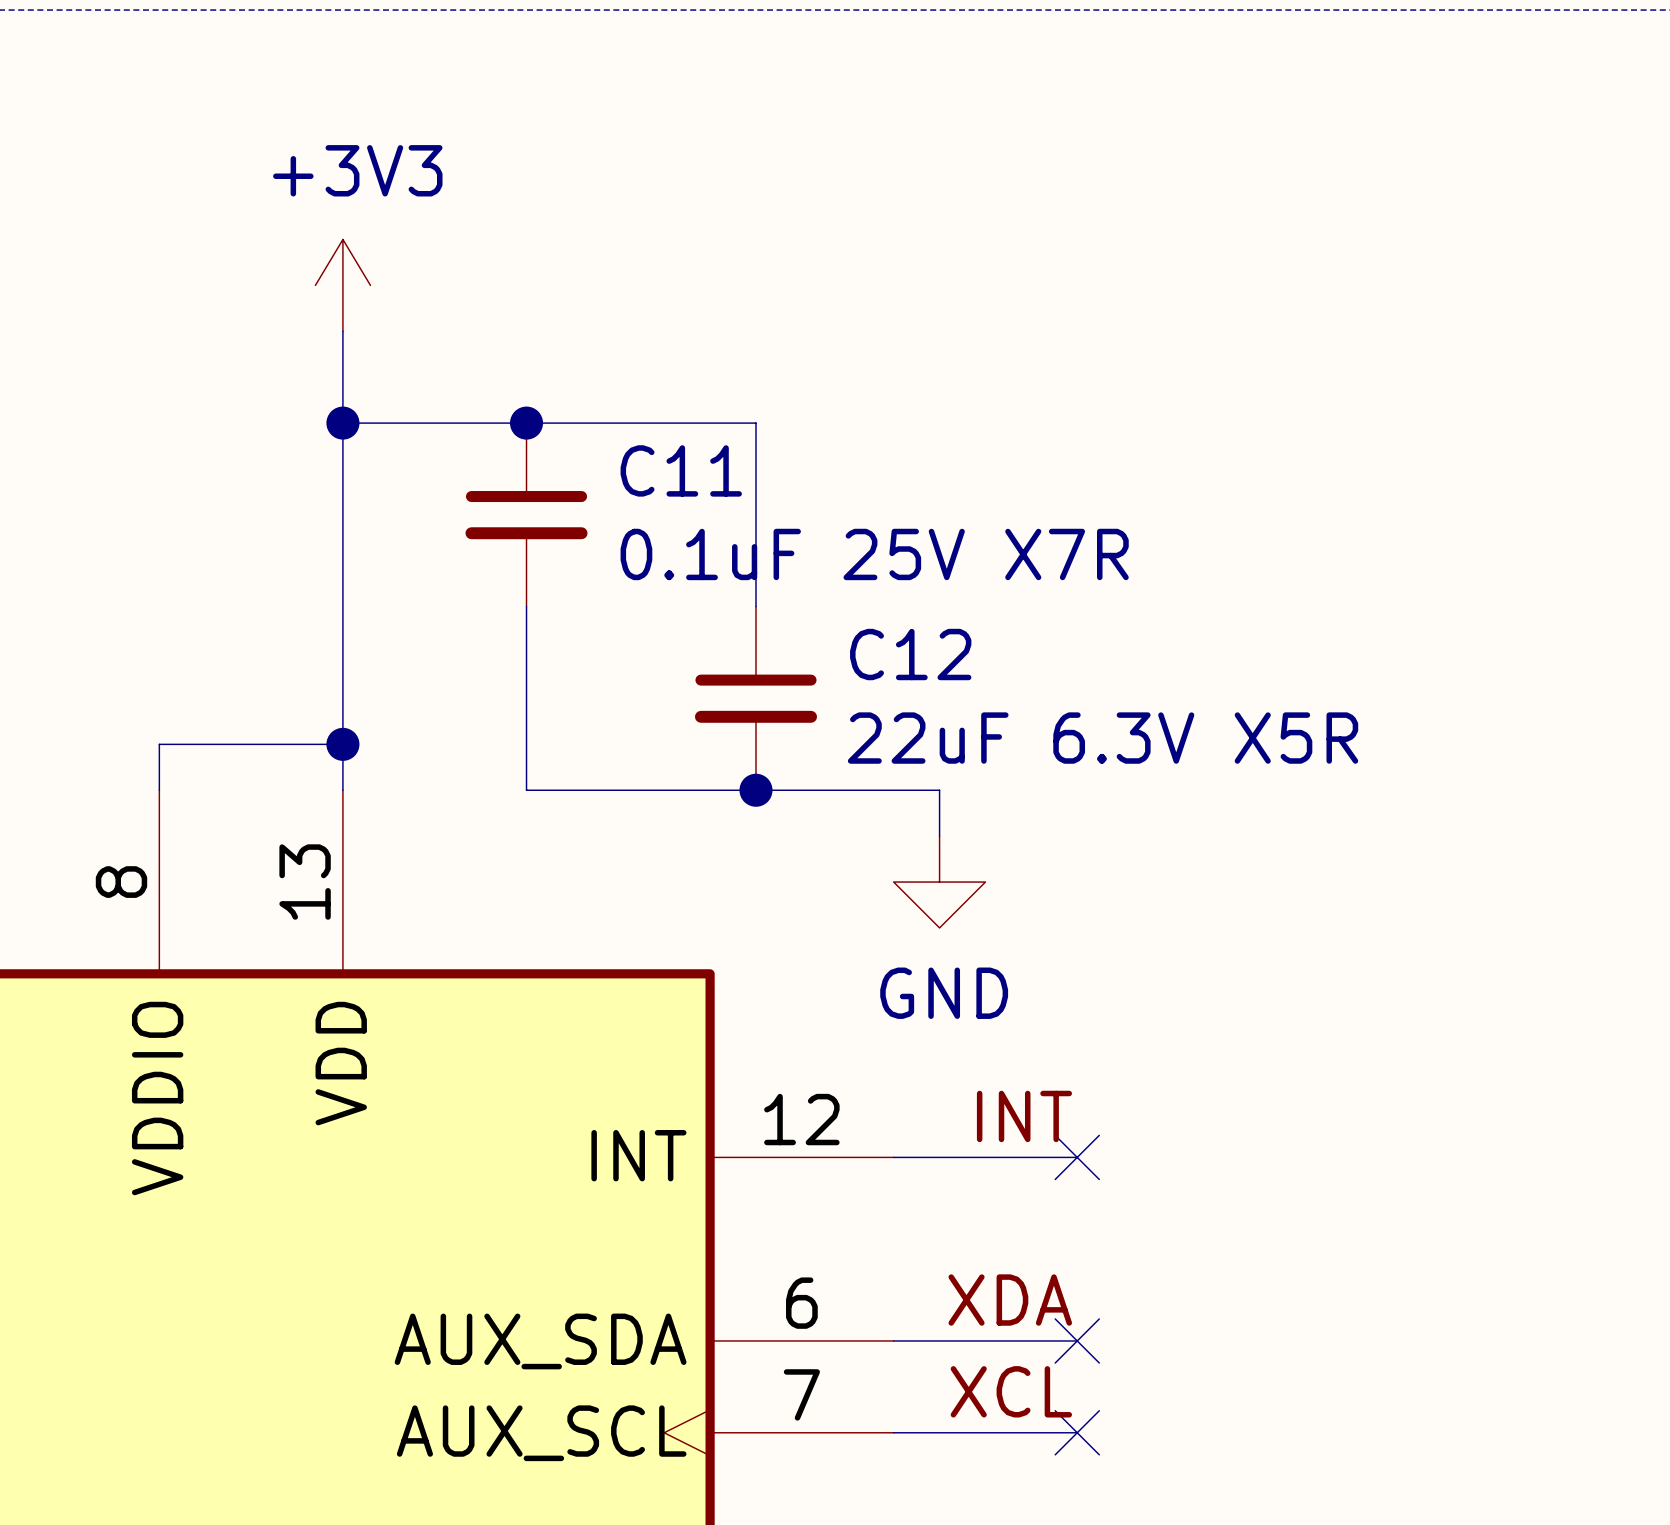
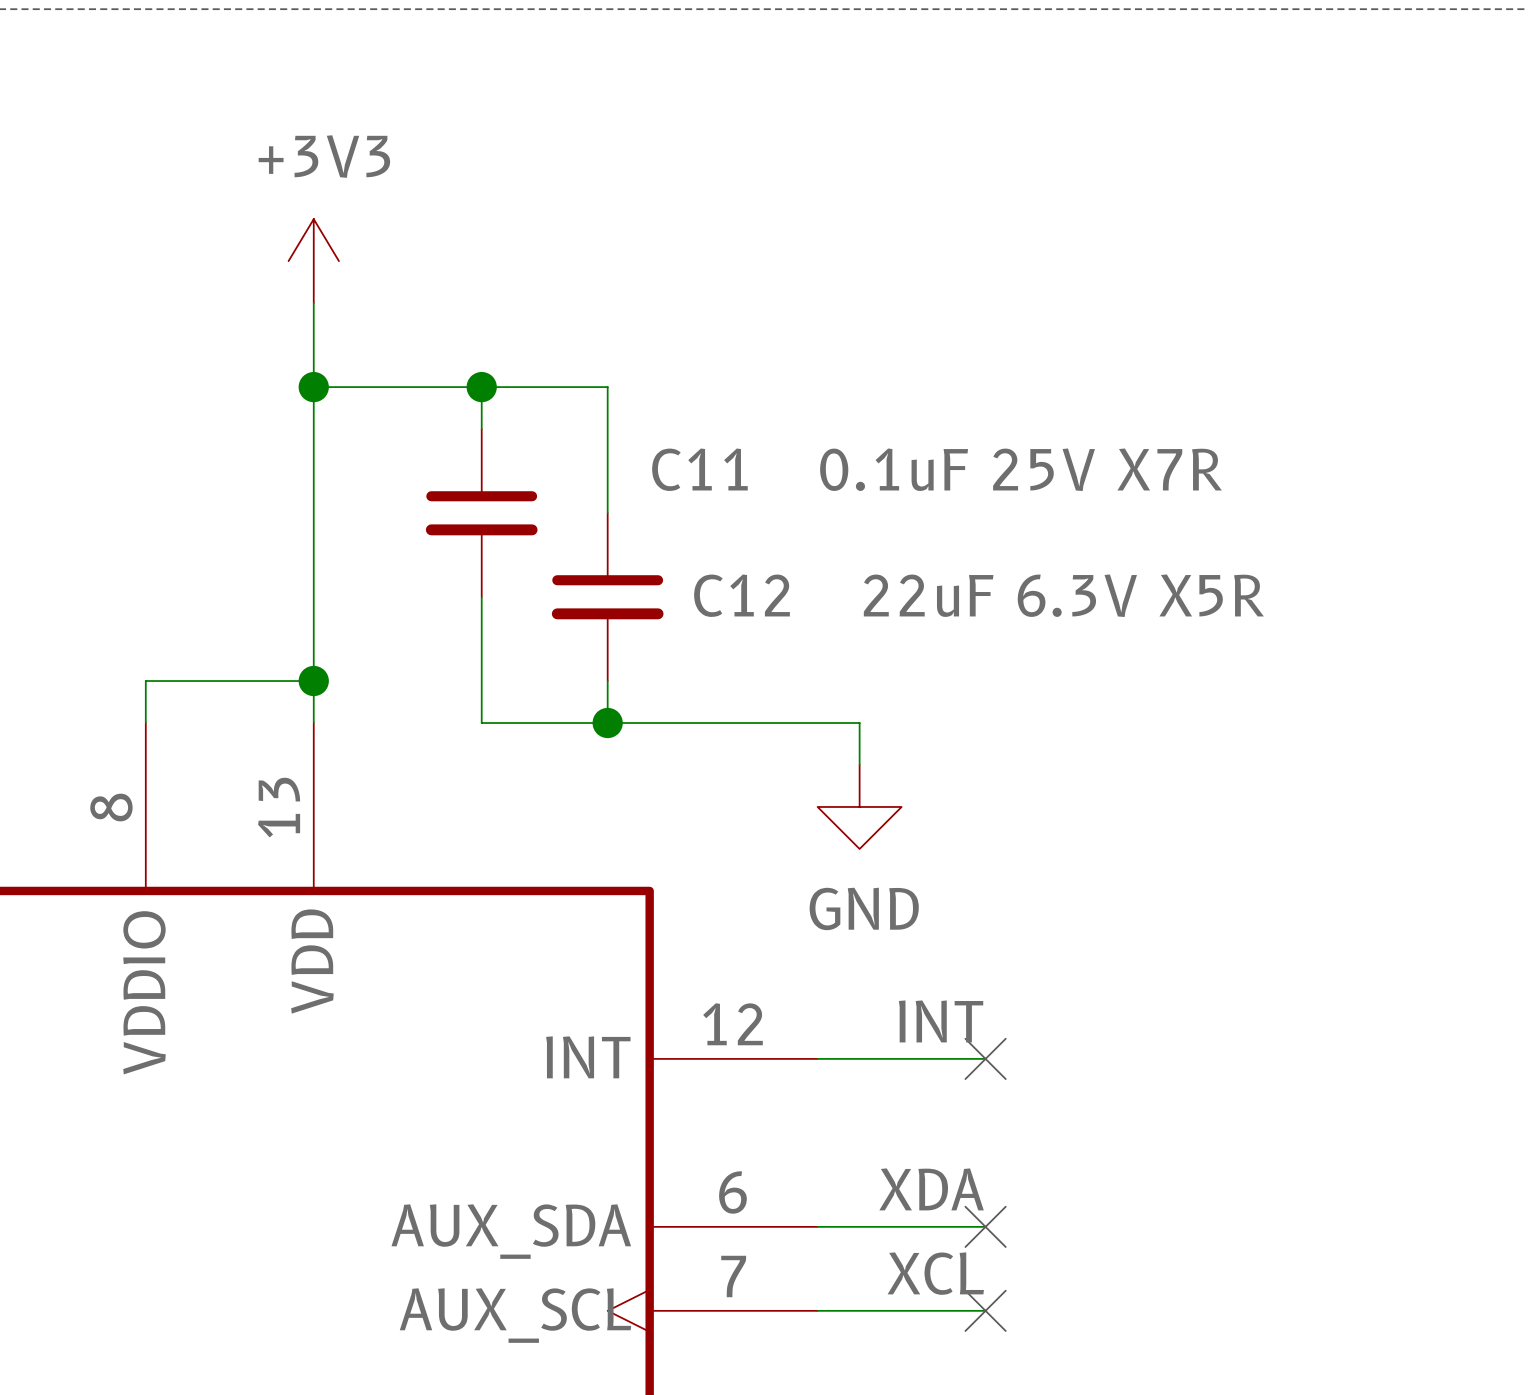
wire: (664, 423) (755, 423) (755, 606) -> (607, 387) (607, 513)
C11 name position: C11 (681, 470) -> C11 (699, 469)
C11 position: (526, 514) -> (481, 513)
C11 value position: 0.1uF 25V X7R (874, 554) -> 0.1uF 25V X7R (1020, 469)
C12 name position: C12 (910, 654) -> C12 (742, 595)
C12 position: (755, 698) -> (607, 597)
C12 value position: 22uF 6.3V X5R (1103, 738) -> 22uF 6.3V X5R (1063, 595)
wire: none -> (607, 681) (607, 723)
junction position: (755, 790) -> (607, 723)

